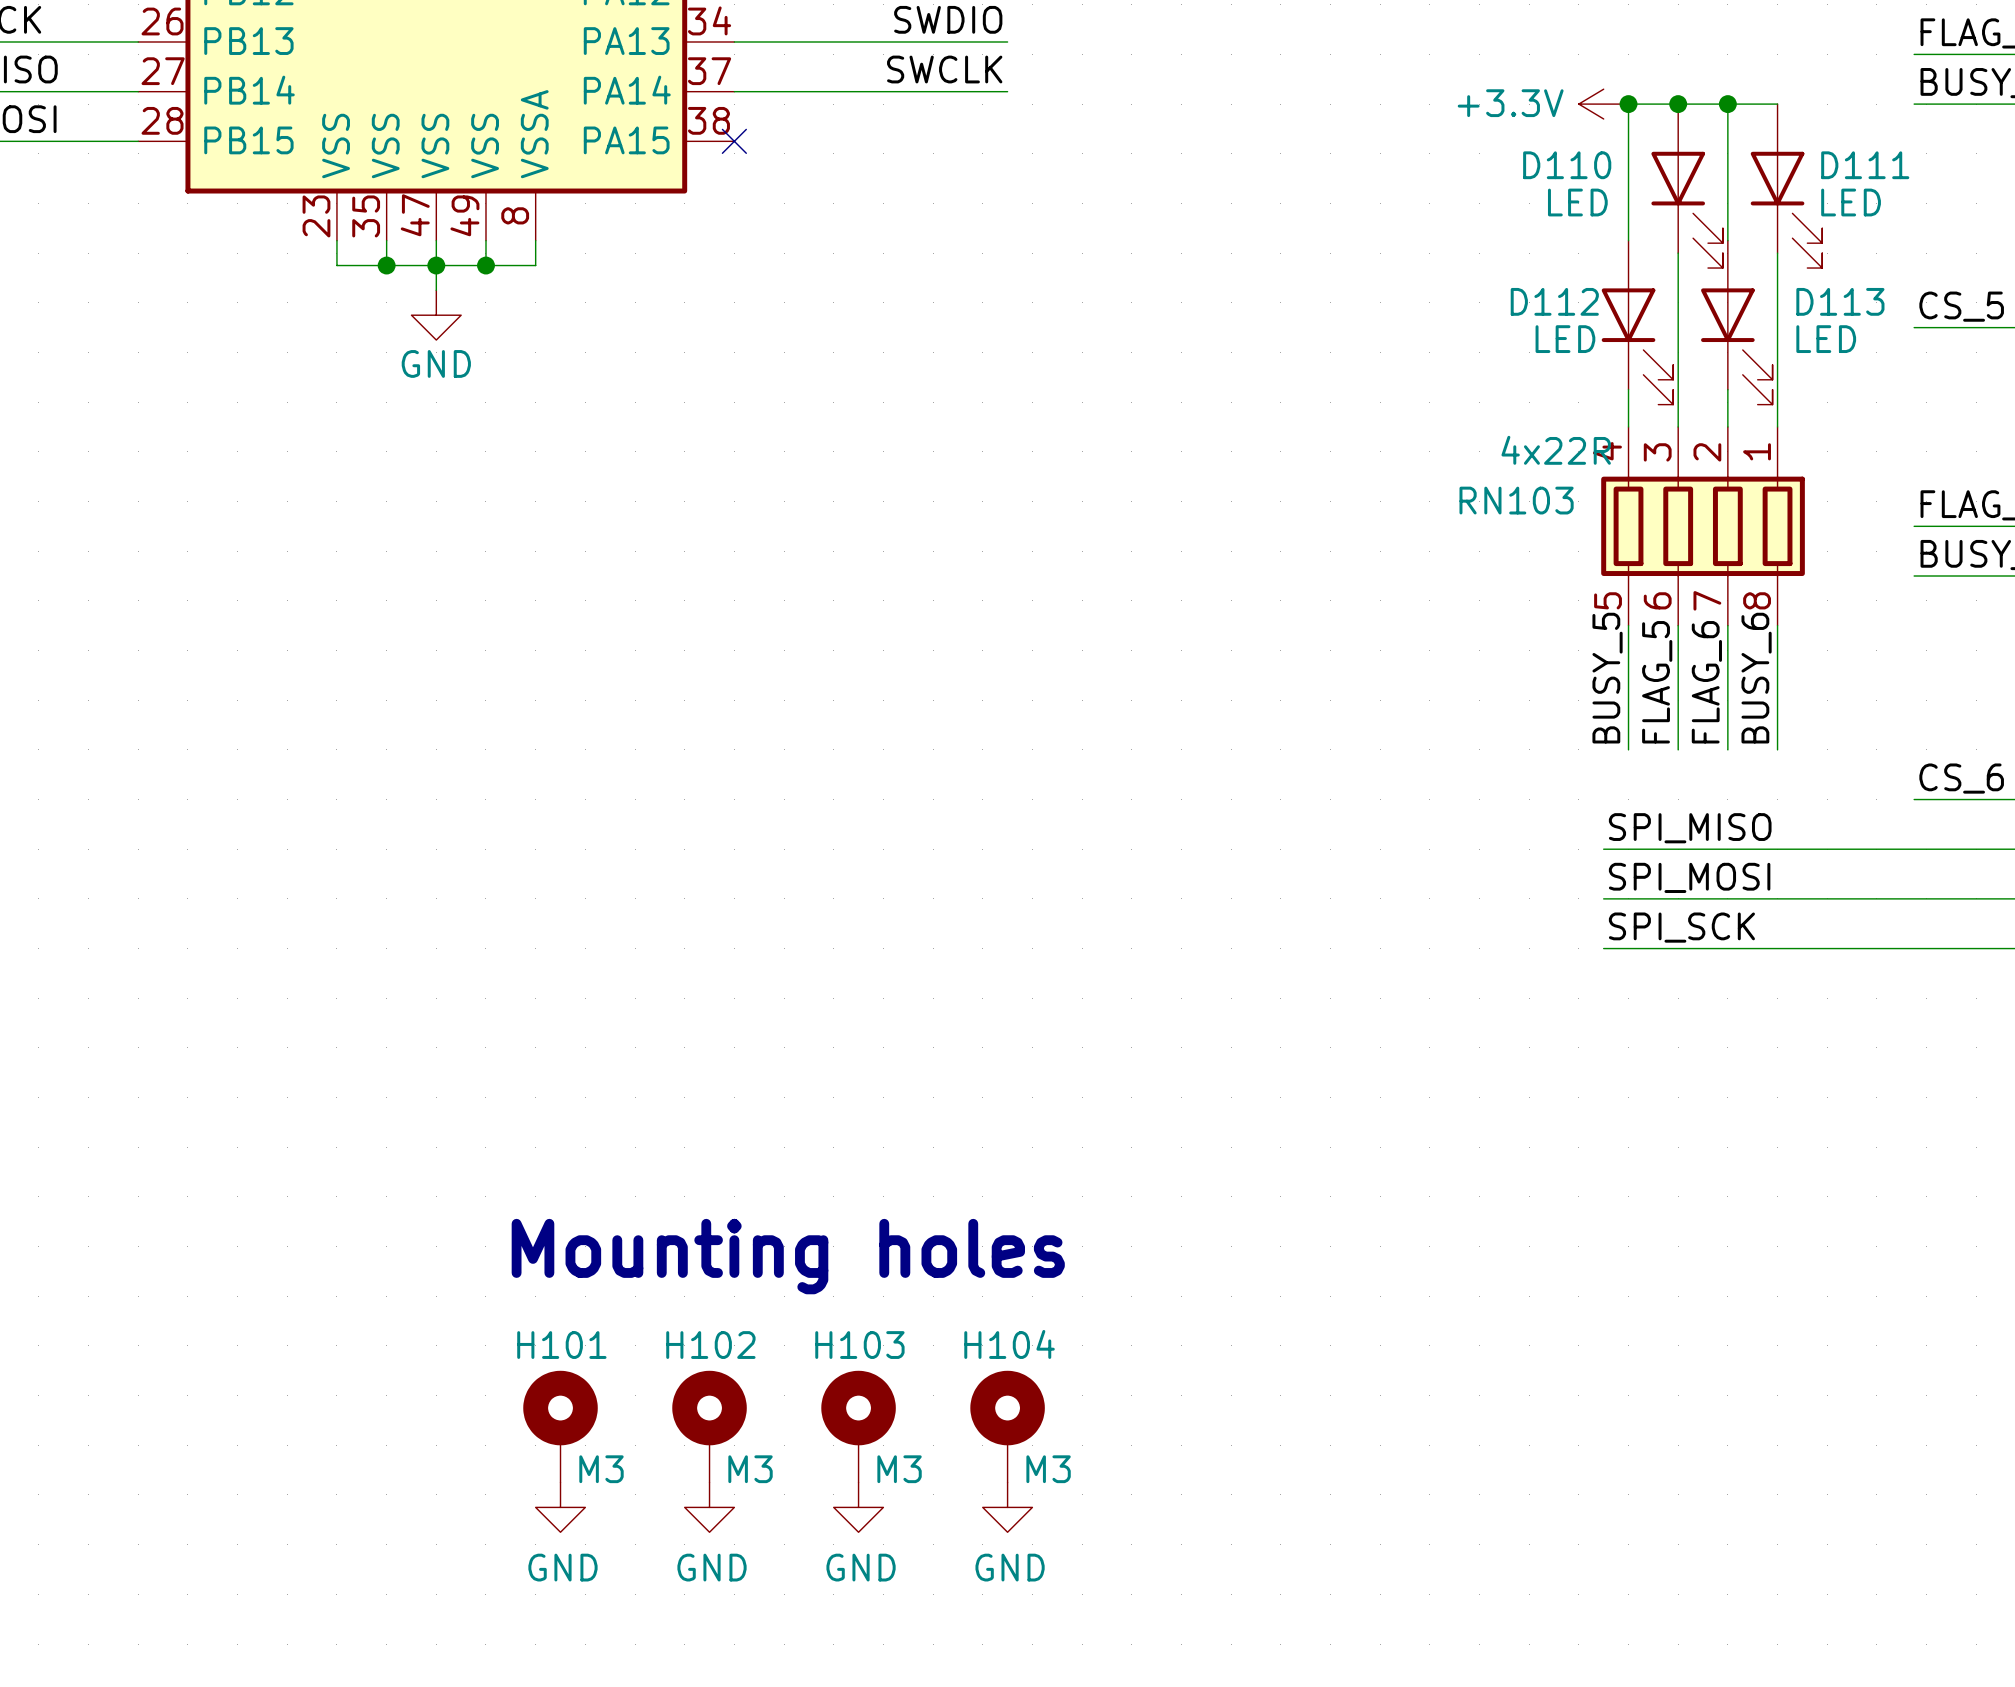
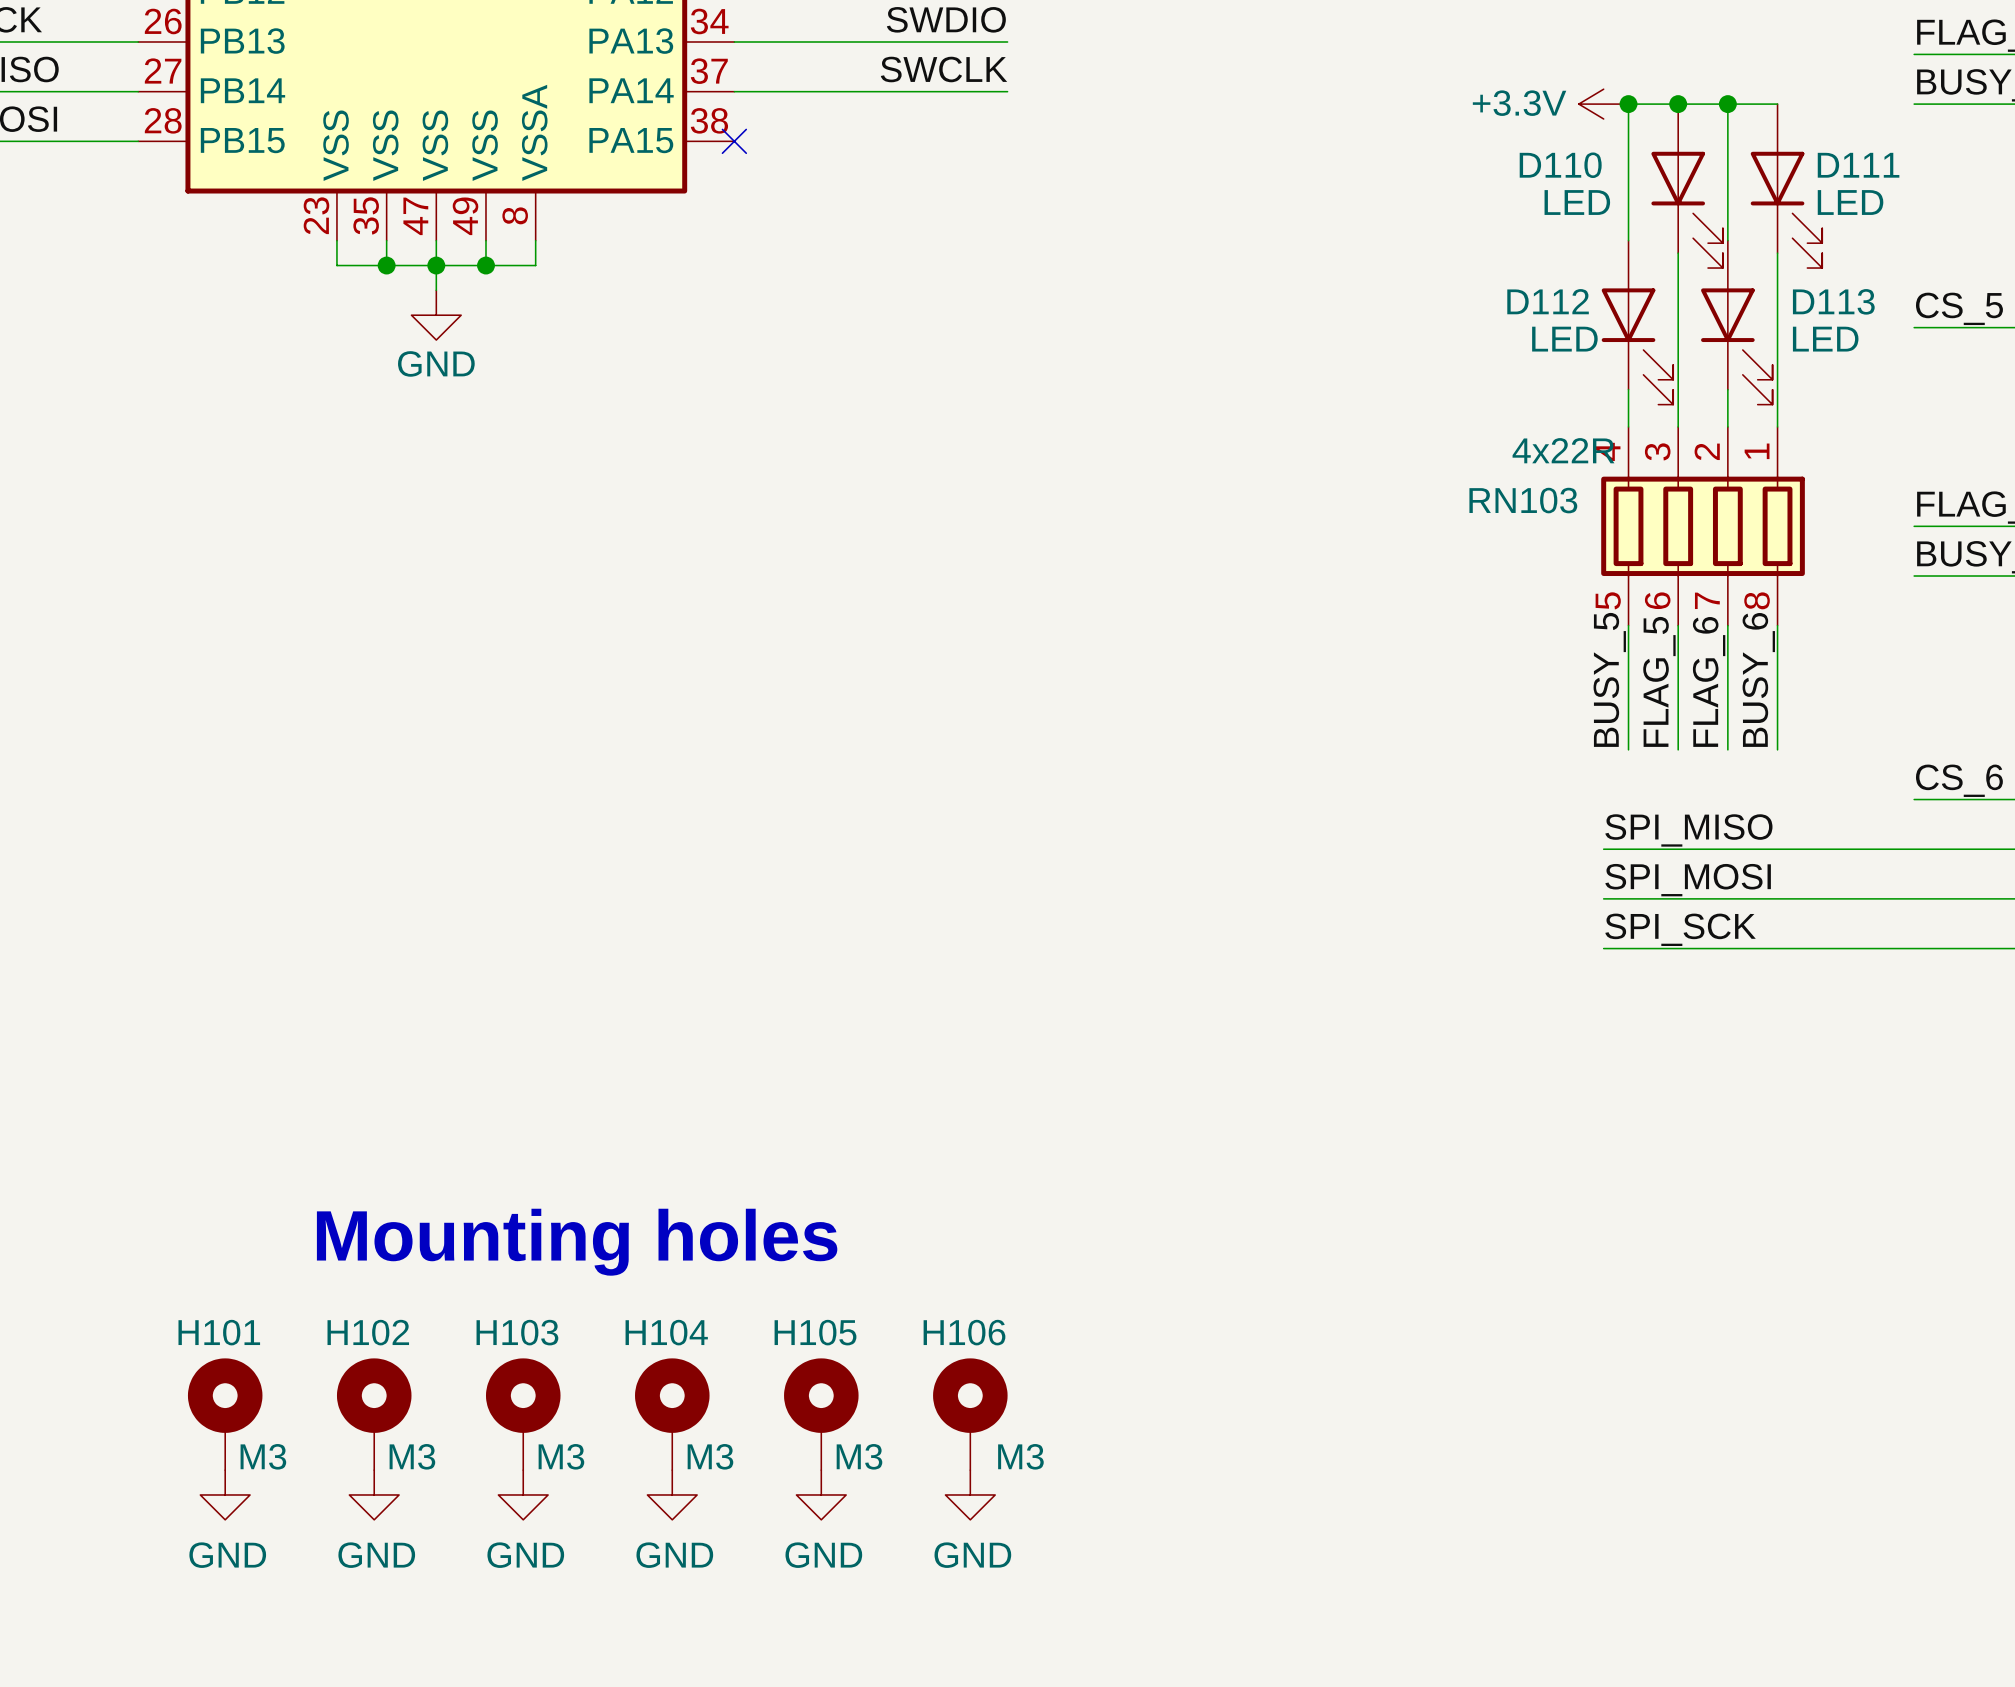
text position: Mounting holes (788, 1256) -> Mounting holes (577, 1242)
H105: none -> M3 (821, 1414)
H106: none -> M3 (970, 1414)
H101 position: (560, 1426) -> (225, 1414)
H102 position: (709, 1426) -> (374, 1414)
H103 position: (858, 1426) -> (523, 1414)
H104 position: (1007, 1426) -> (672, 1414)
power symbol: none -> GND (225, 1494)
power symbol: none -> GND (374, 1494)
power symbol position: GND (560, 1507) -> GND (523, 1494)
power symbol position: GND (709, 1507) -> GND (672, 1494)
power symbol position: GND (858, 1507) -> GND (821, 1494)
power symbol position: GND (1007, 1507) -> GND (970, 1494)

